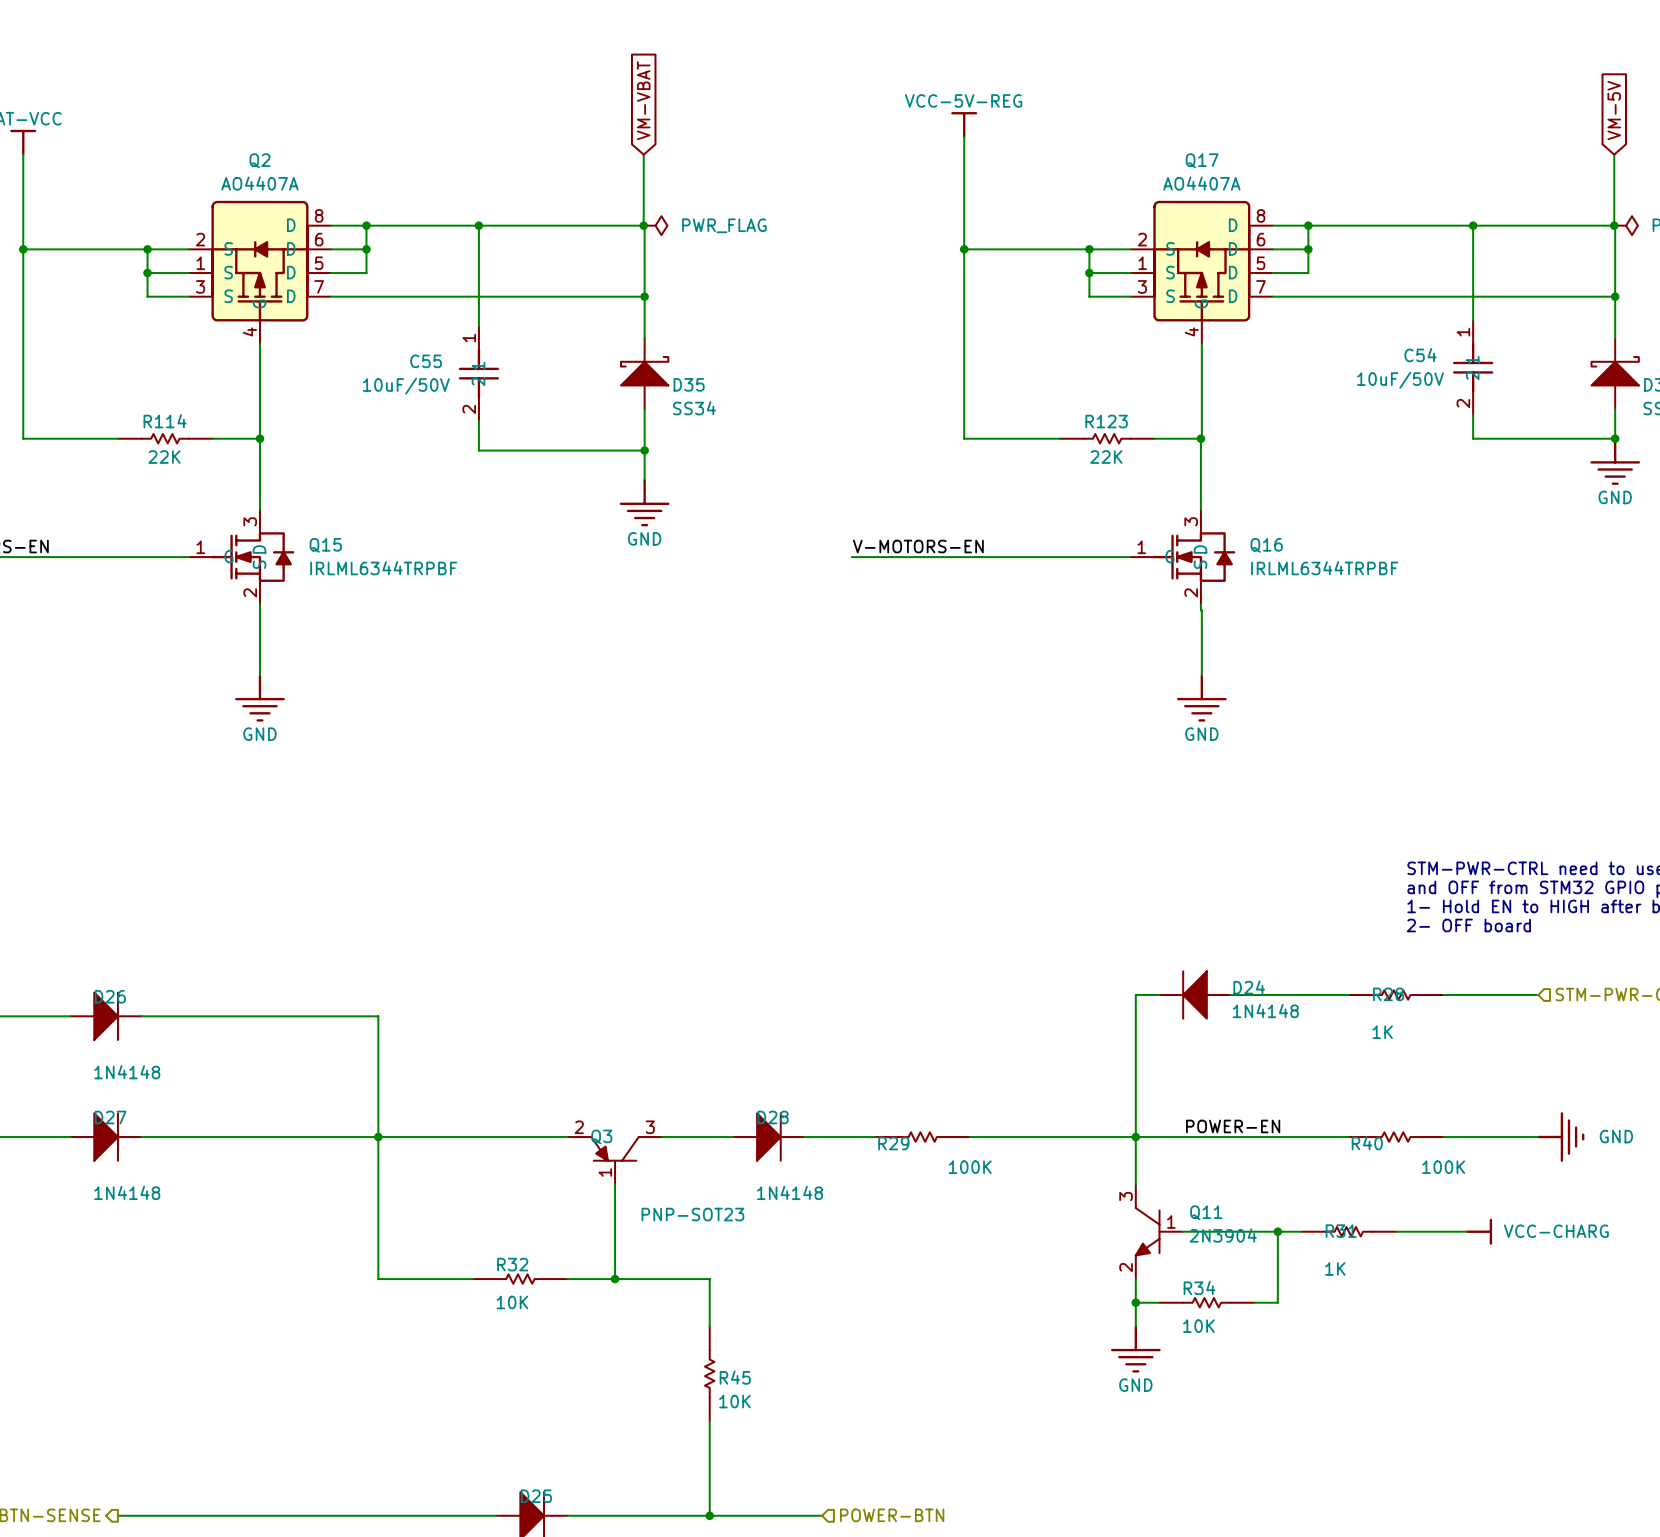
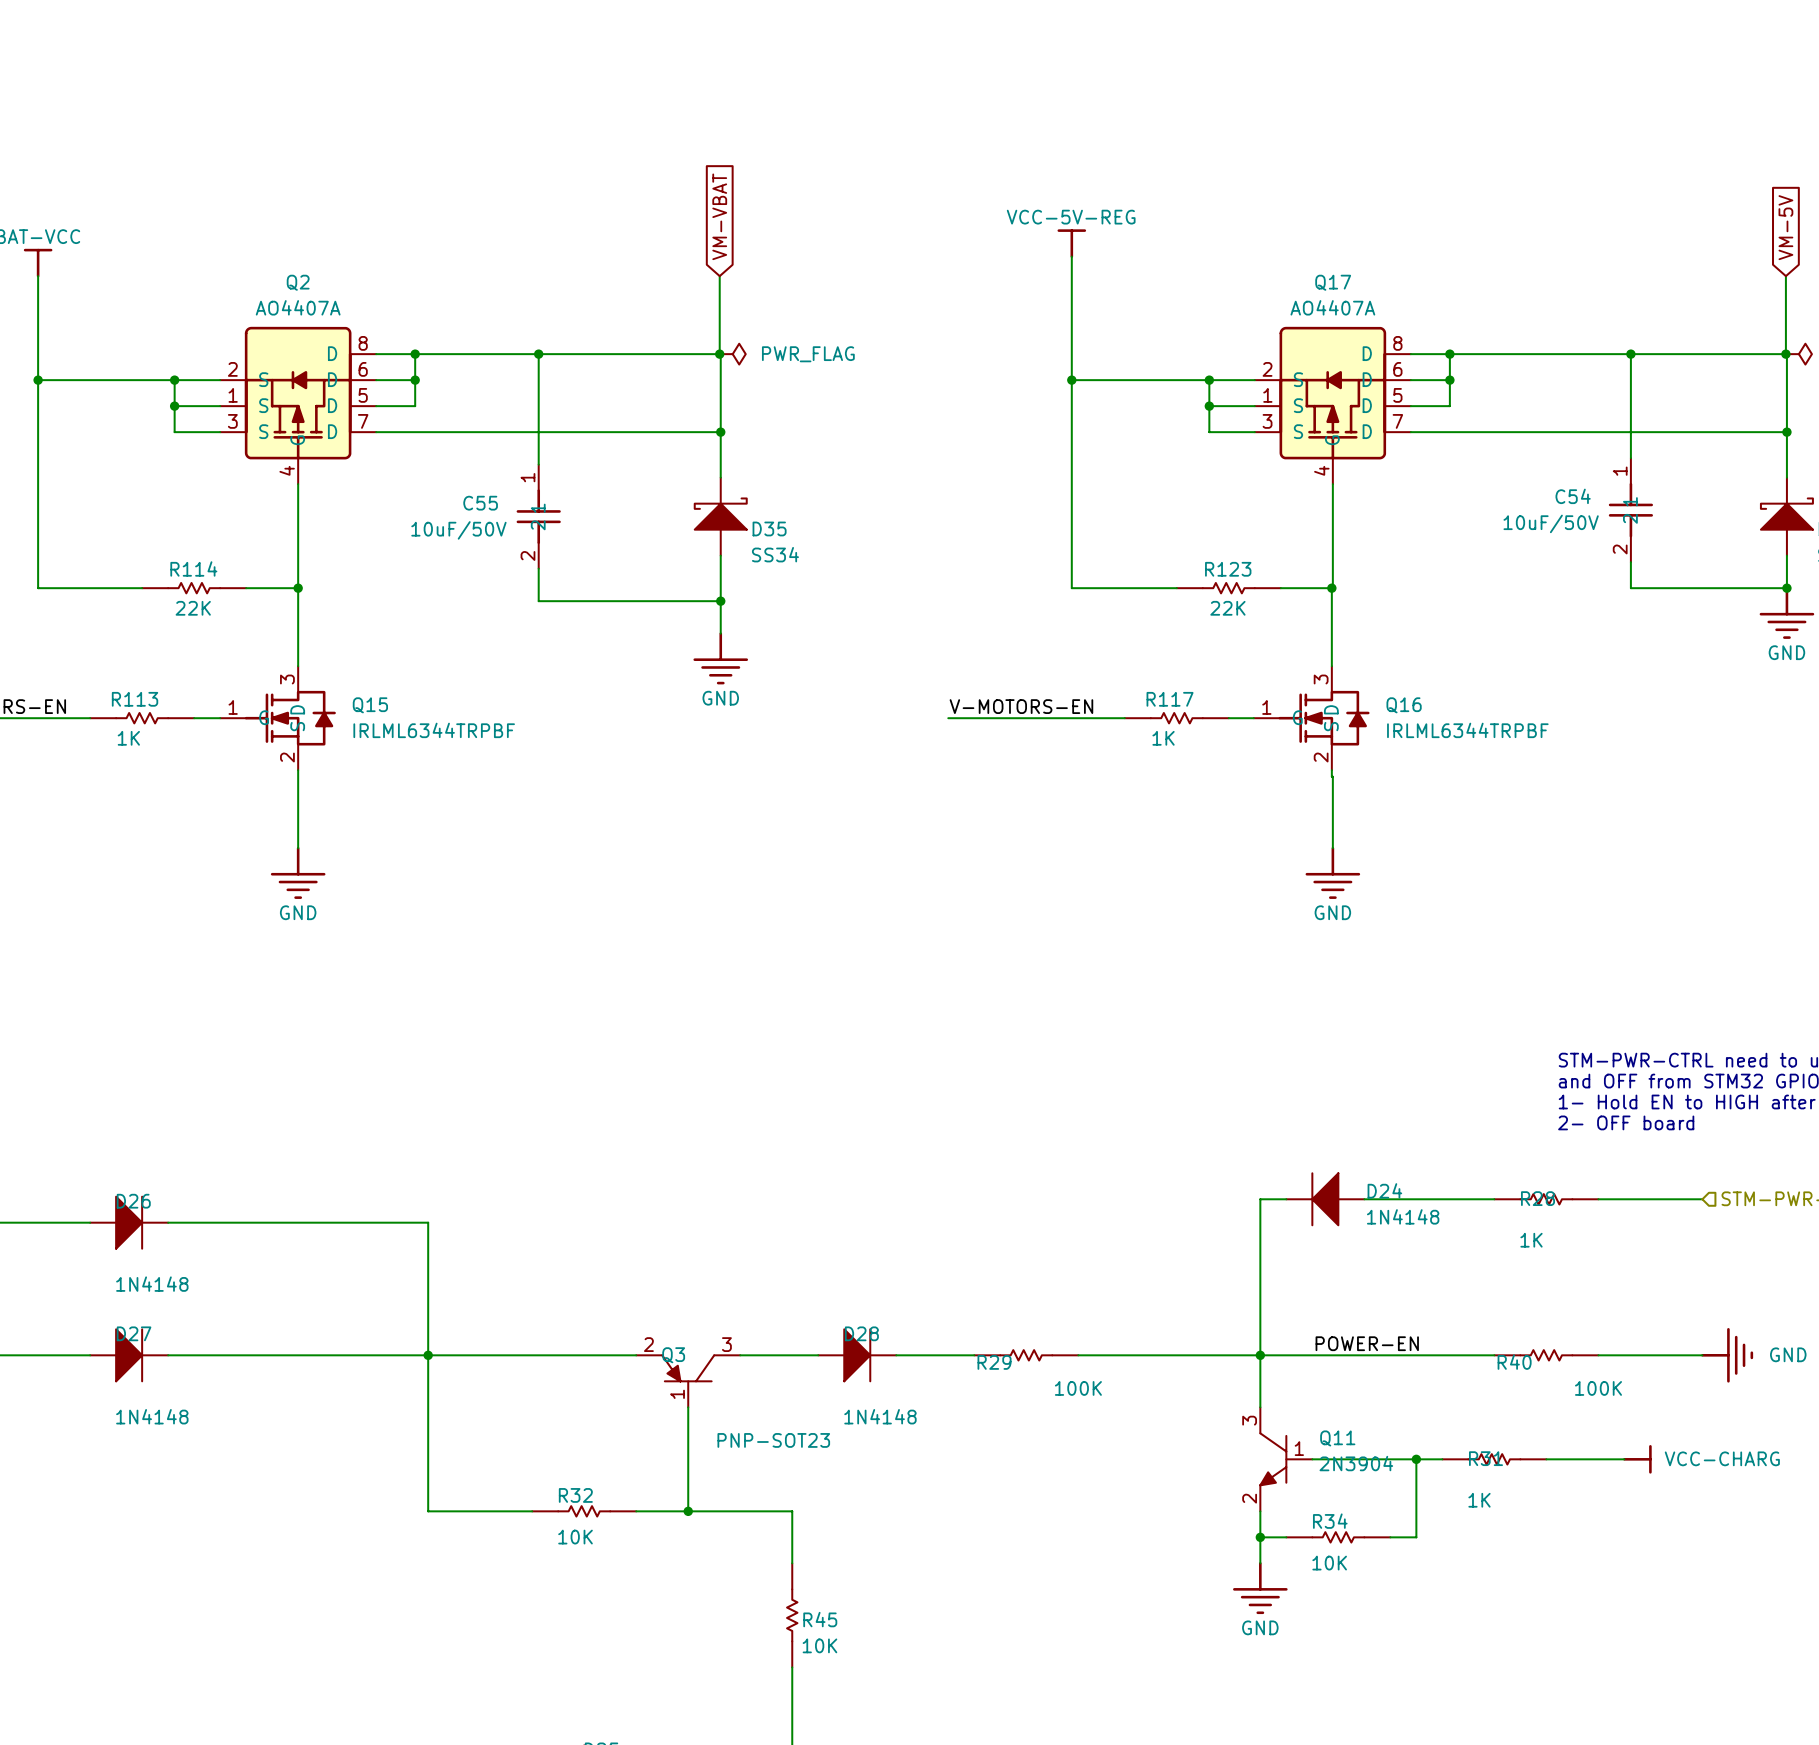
R113: none -> 1K (142, 718)
R117: none -> 1K (1176, 718)

